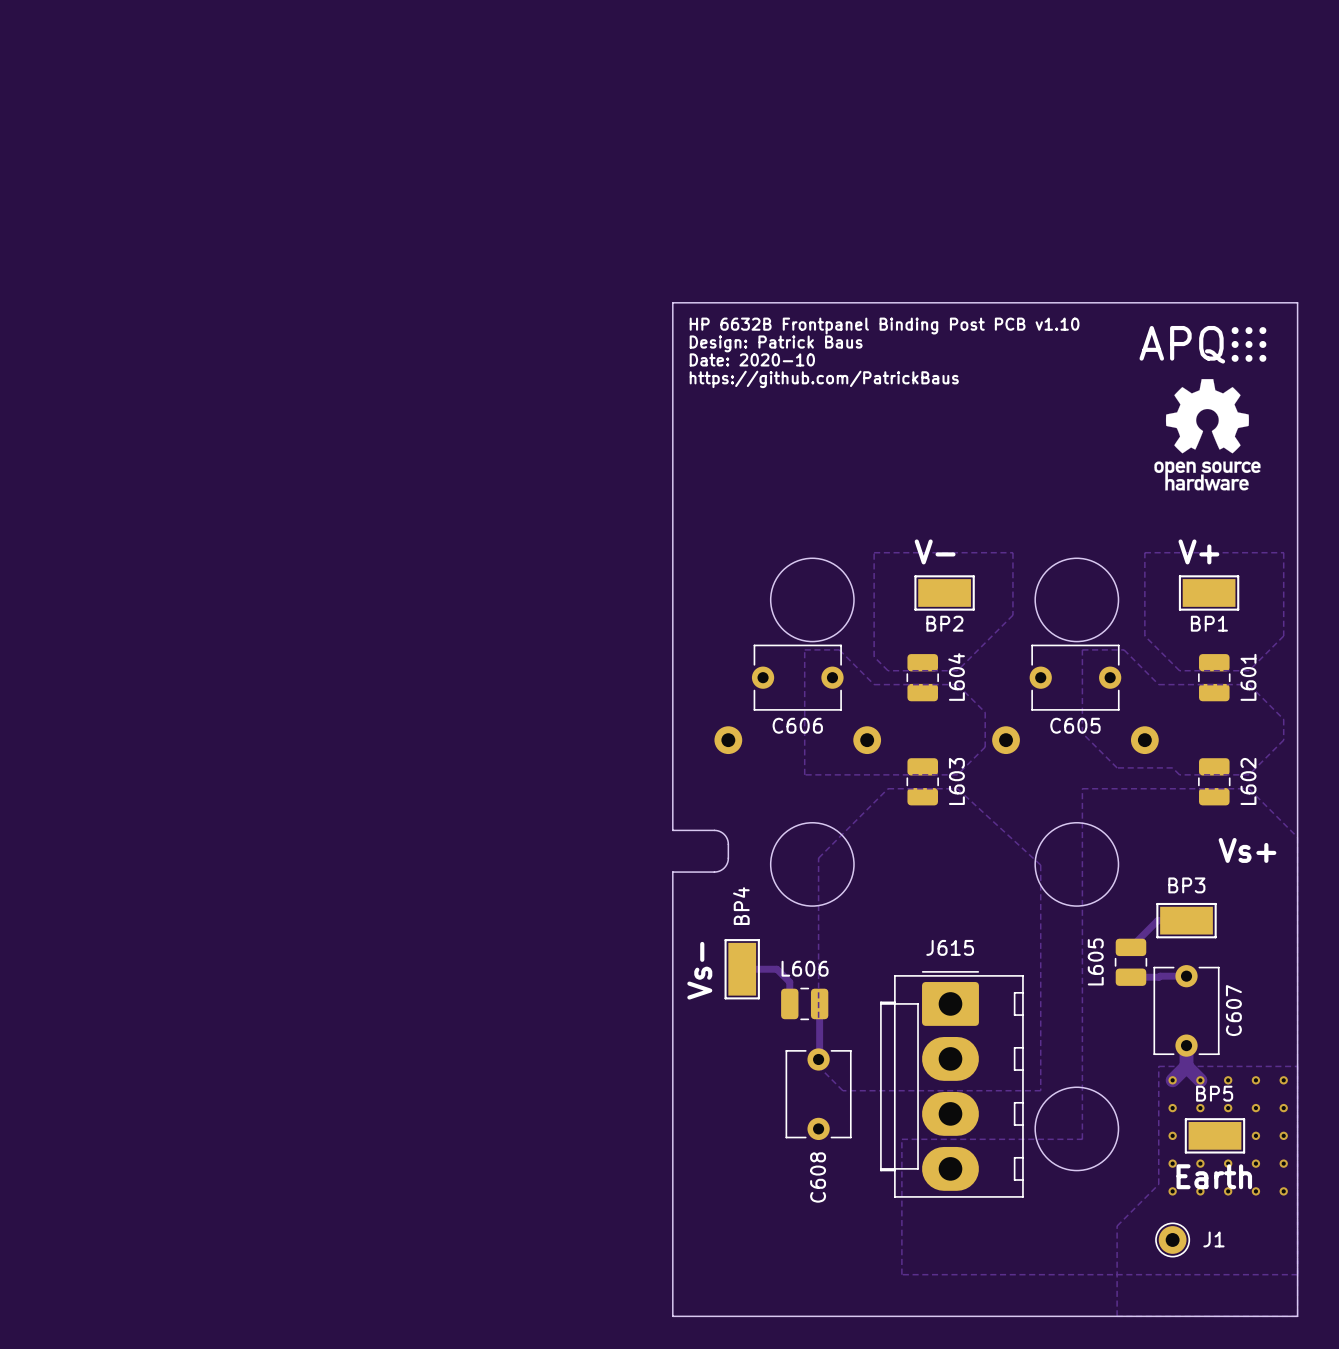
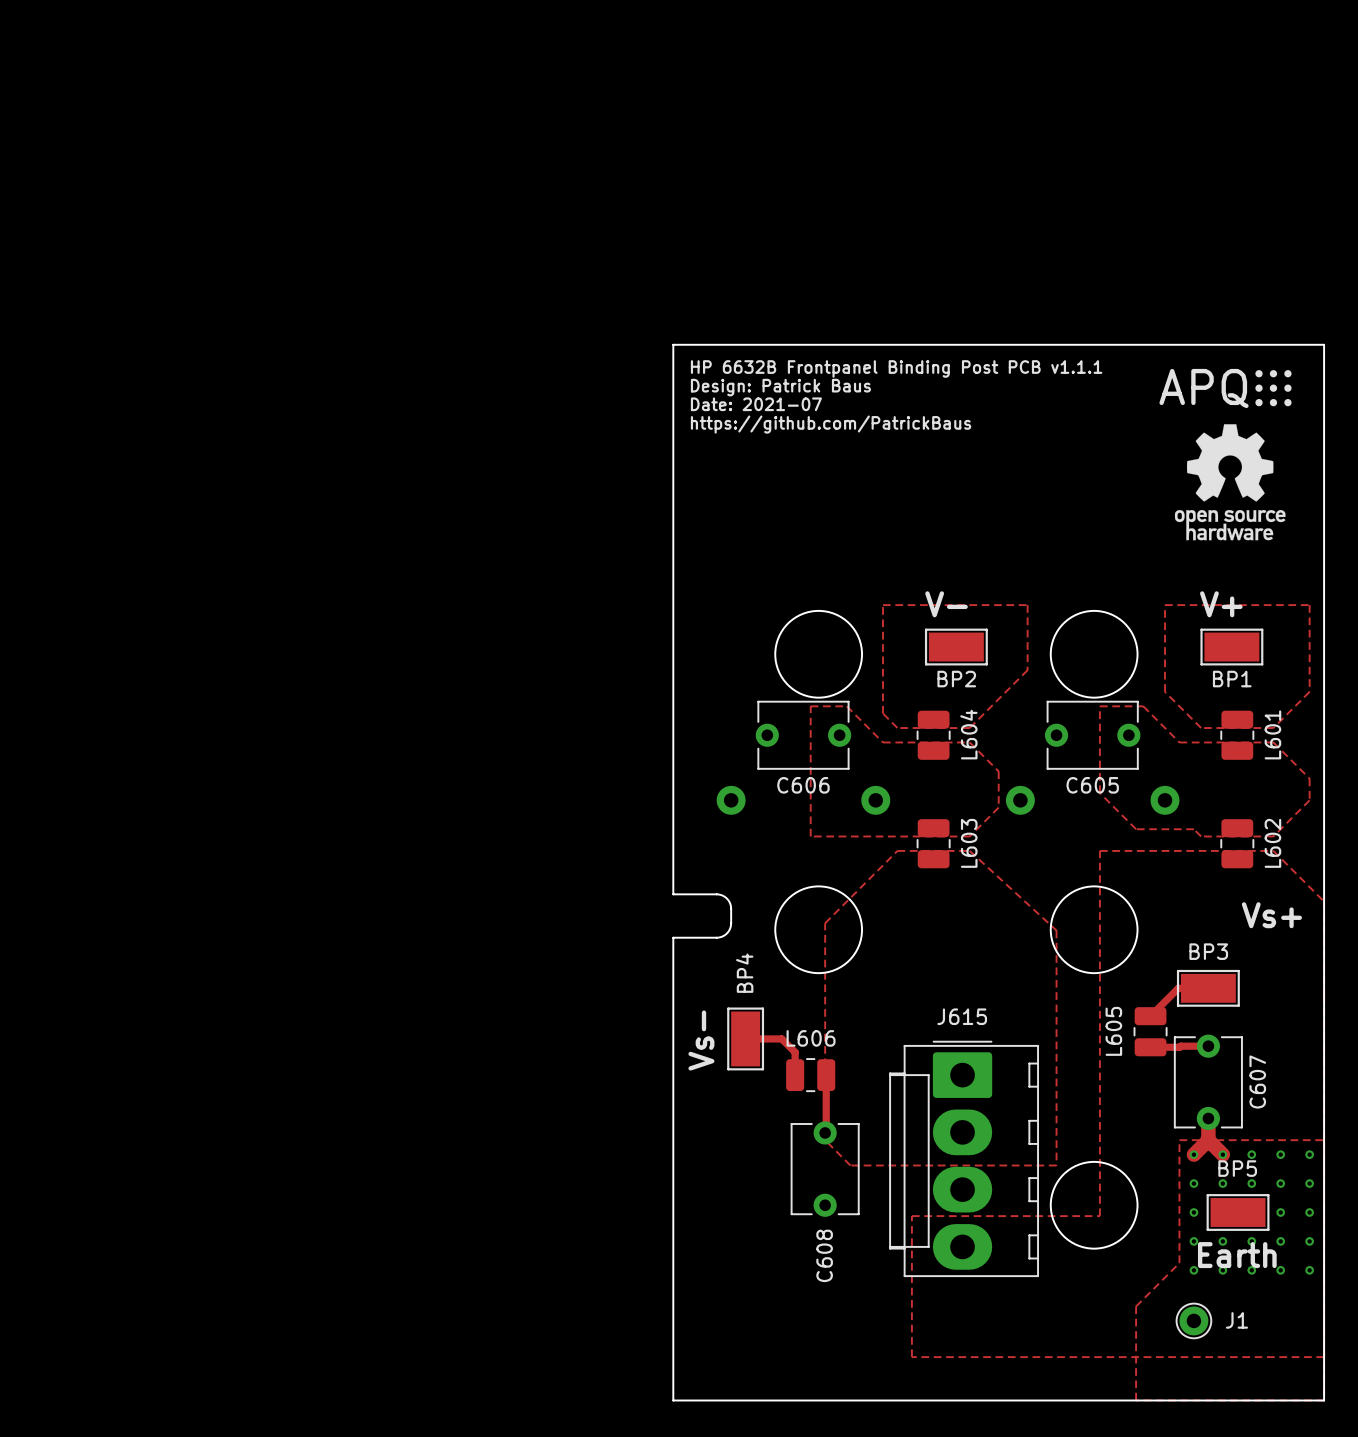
text: HP 6632B Frontpanel Binding Post PCB v1.10 (884, 326) -> HP 6632B Frontpanel Binding Post PCB v1.1.1 (896, 368)
text: Date: 2020-10 (752, 359) -> Date: 2021-07 (756, 404)

